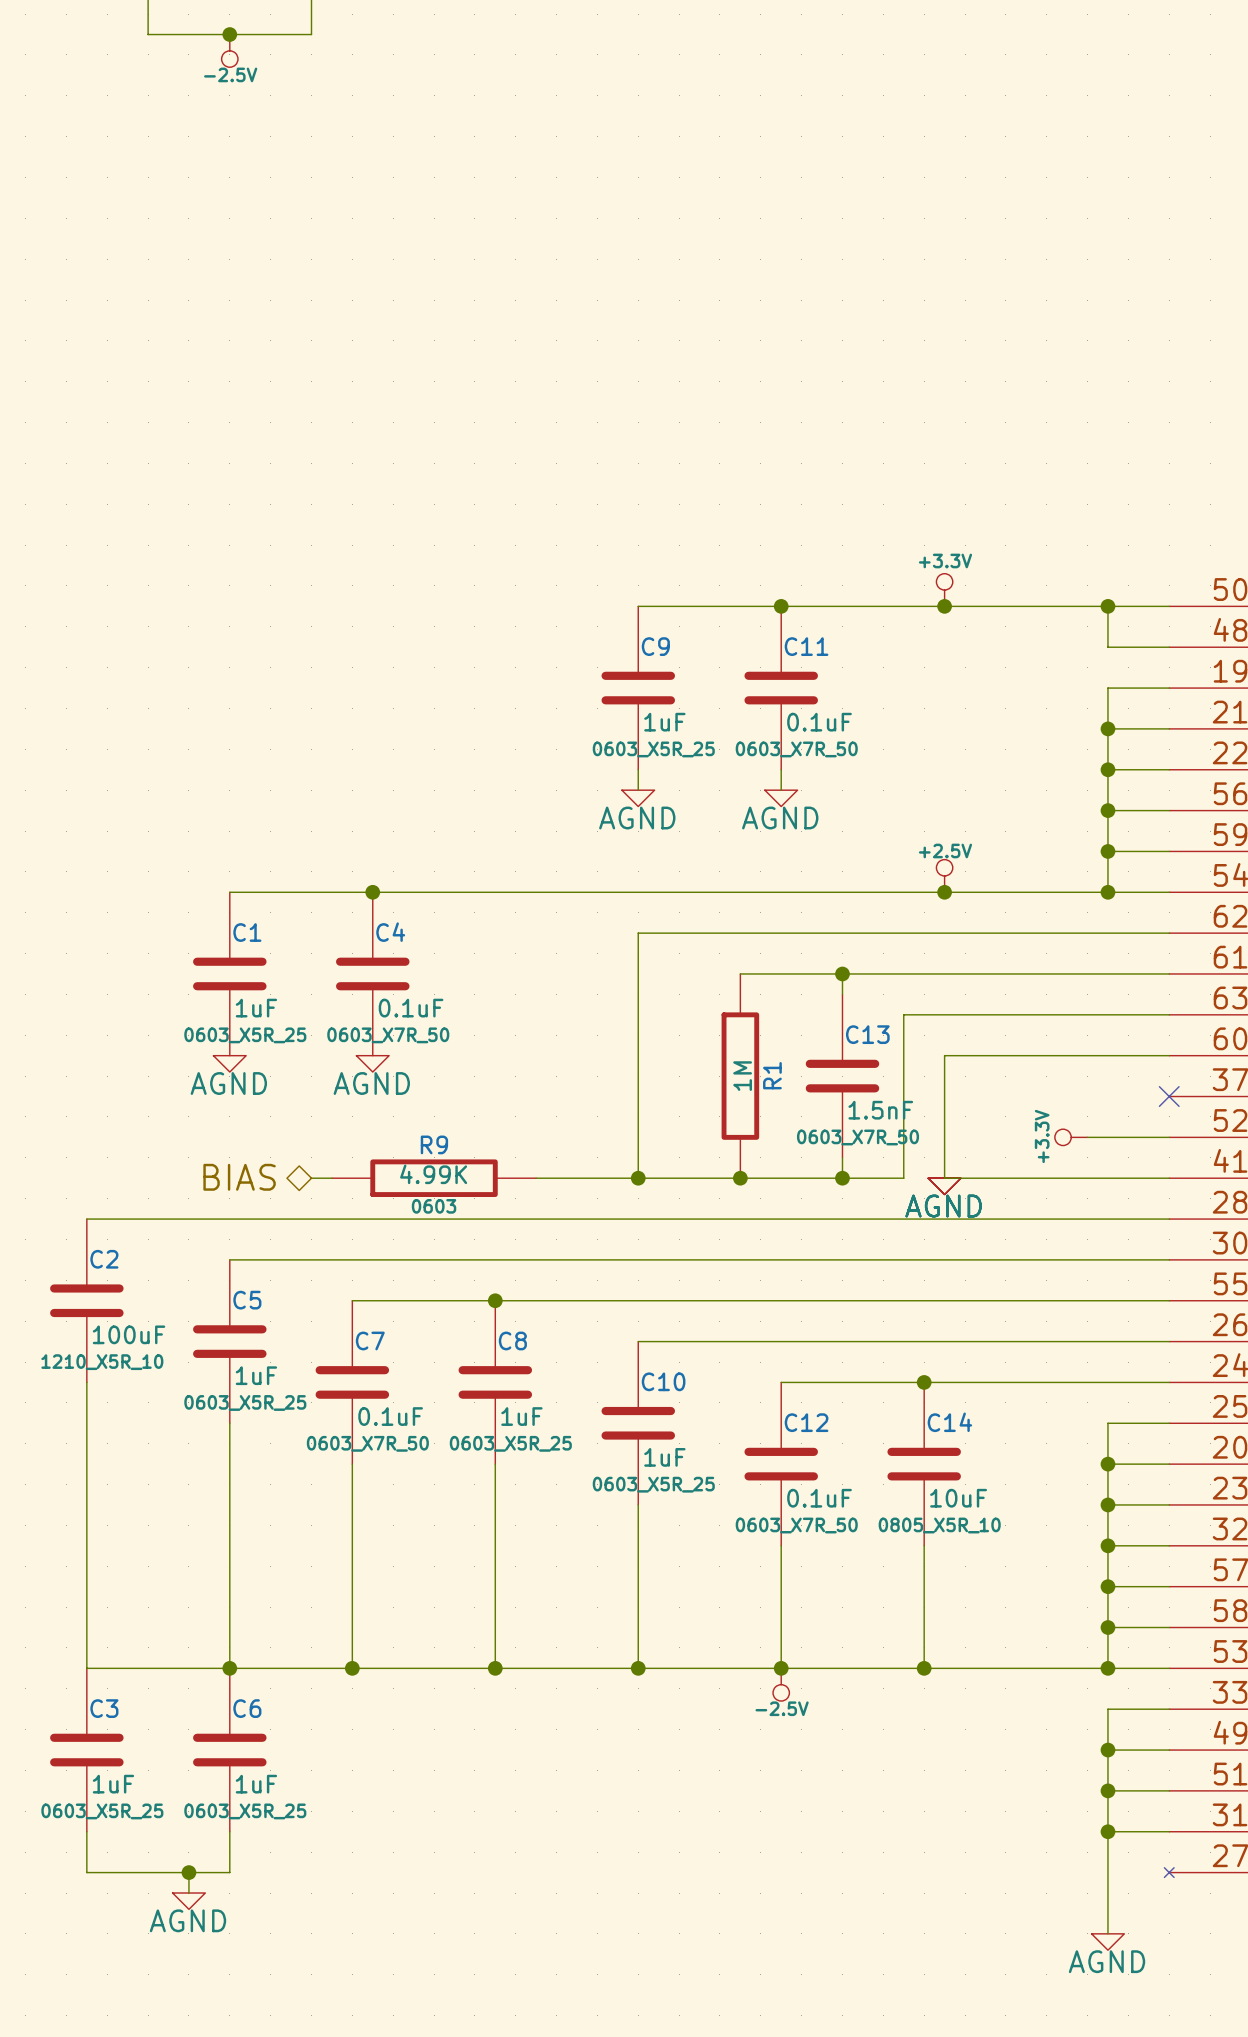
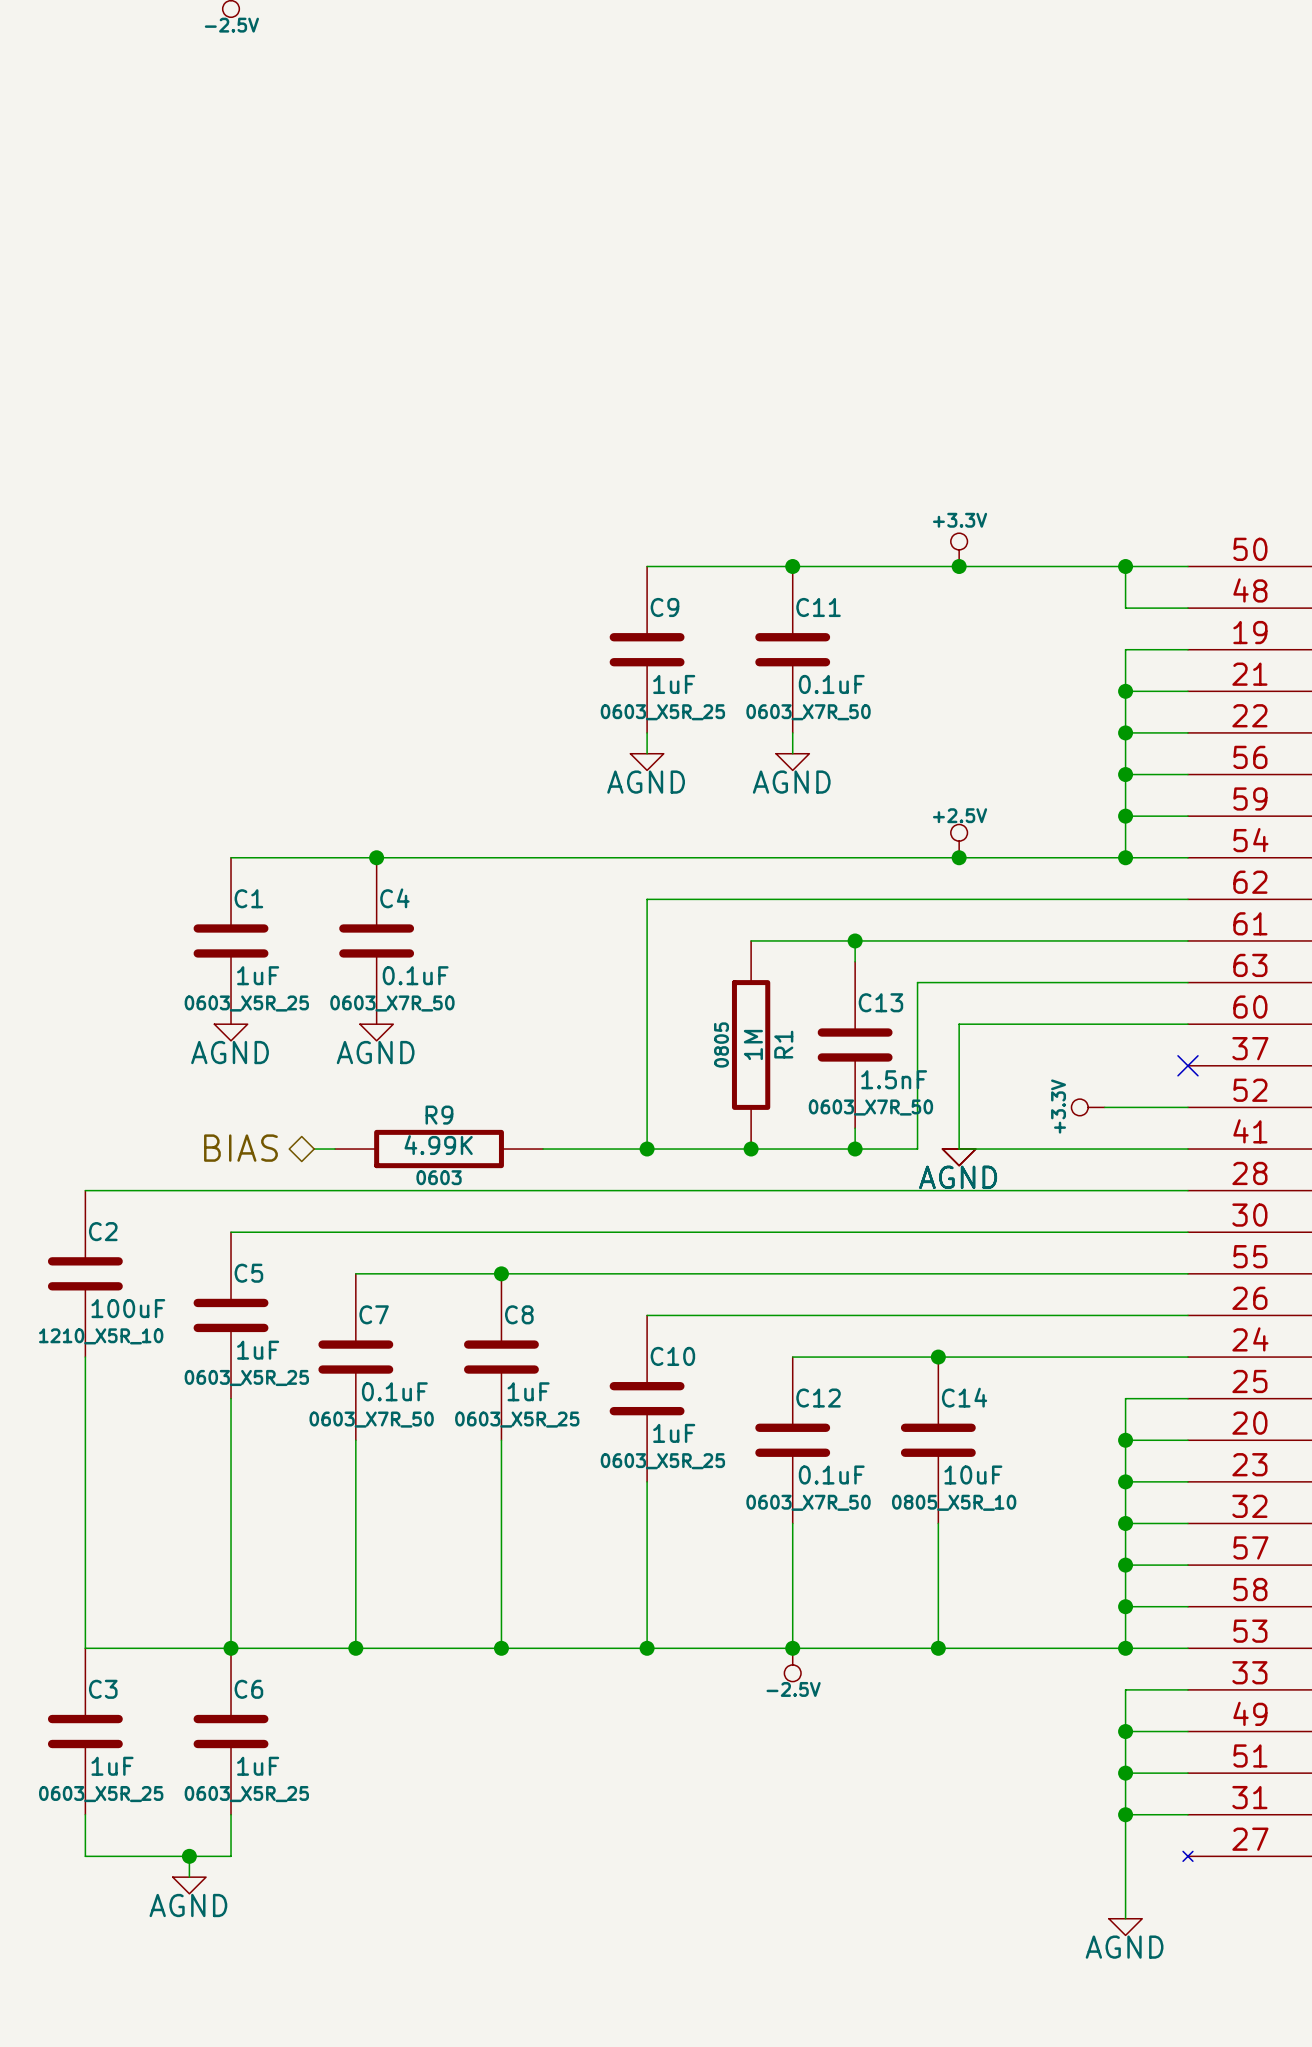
R1 text: none -> 0805 (721, 1044)

